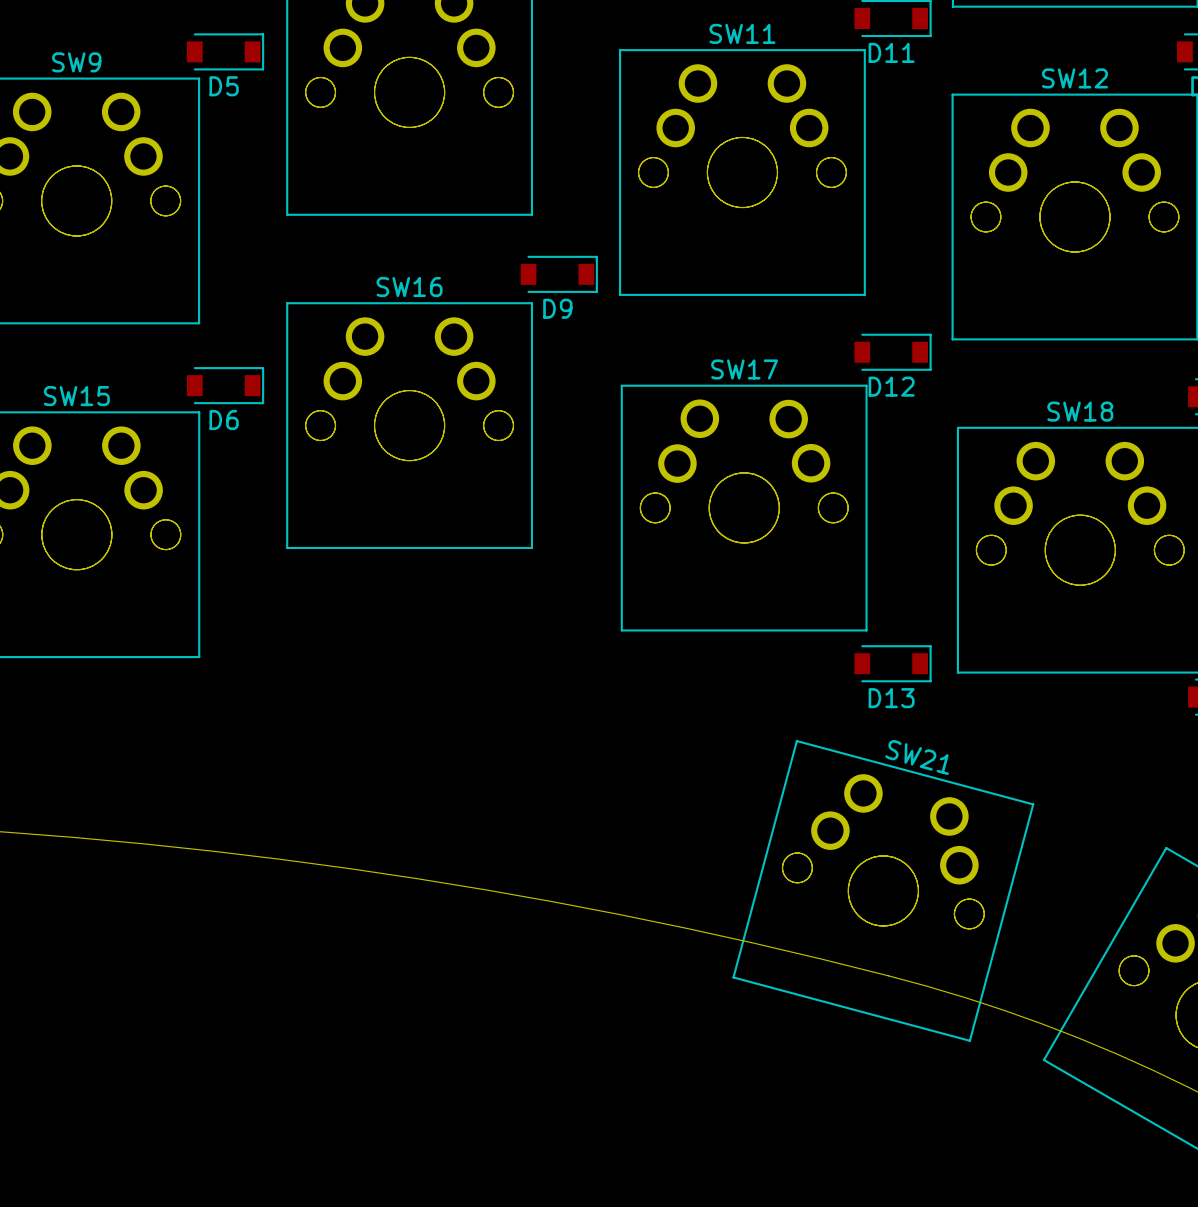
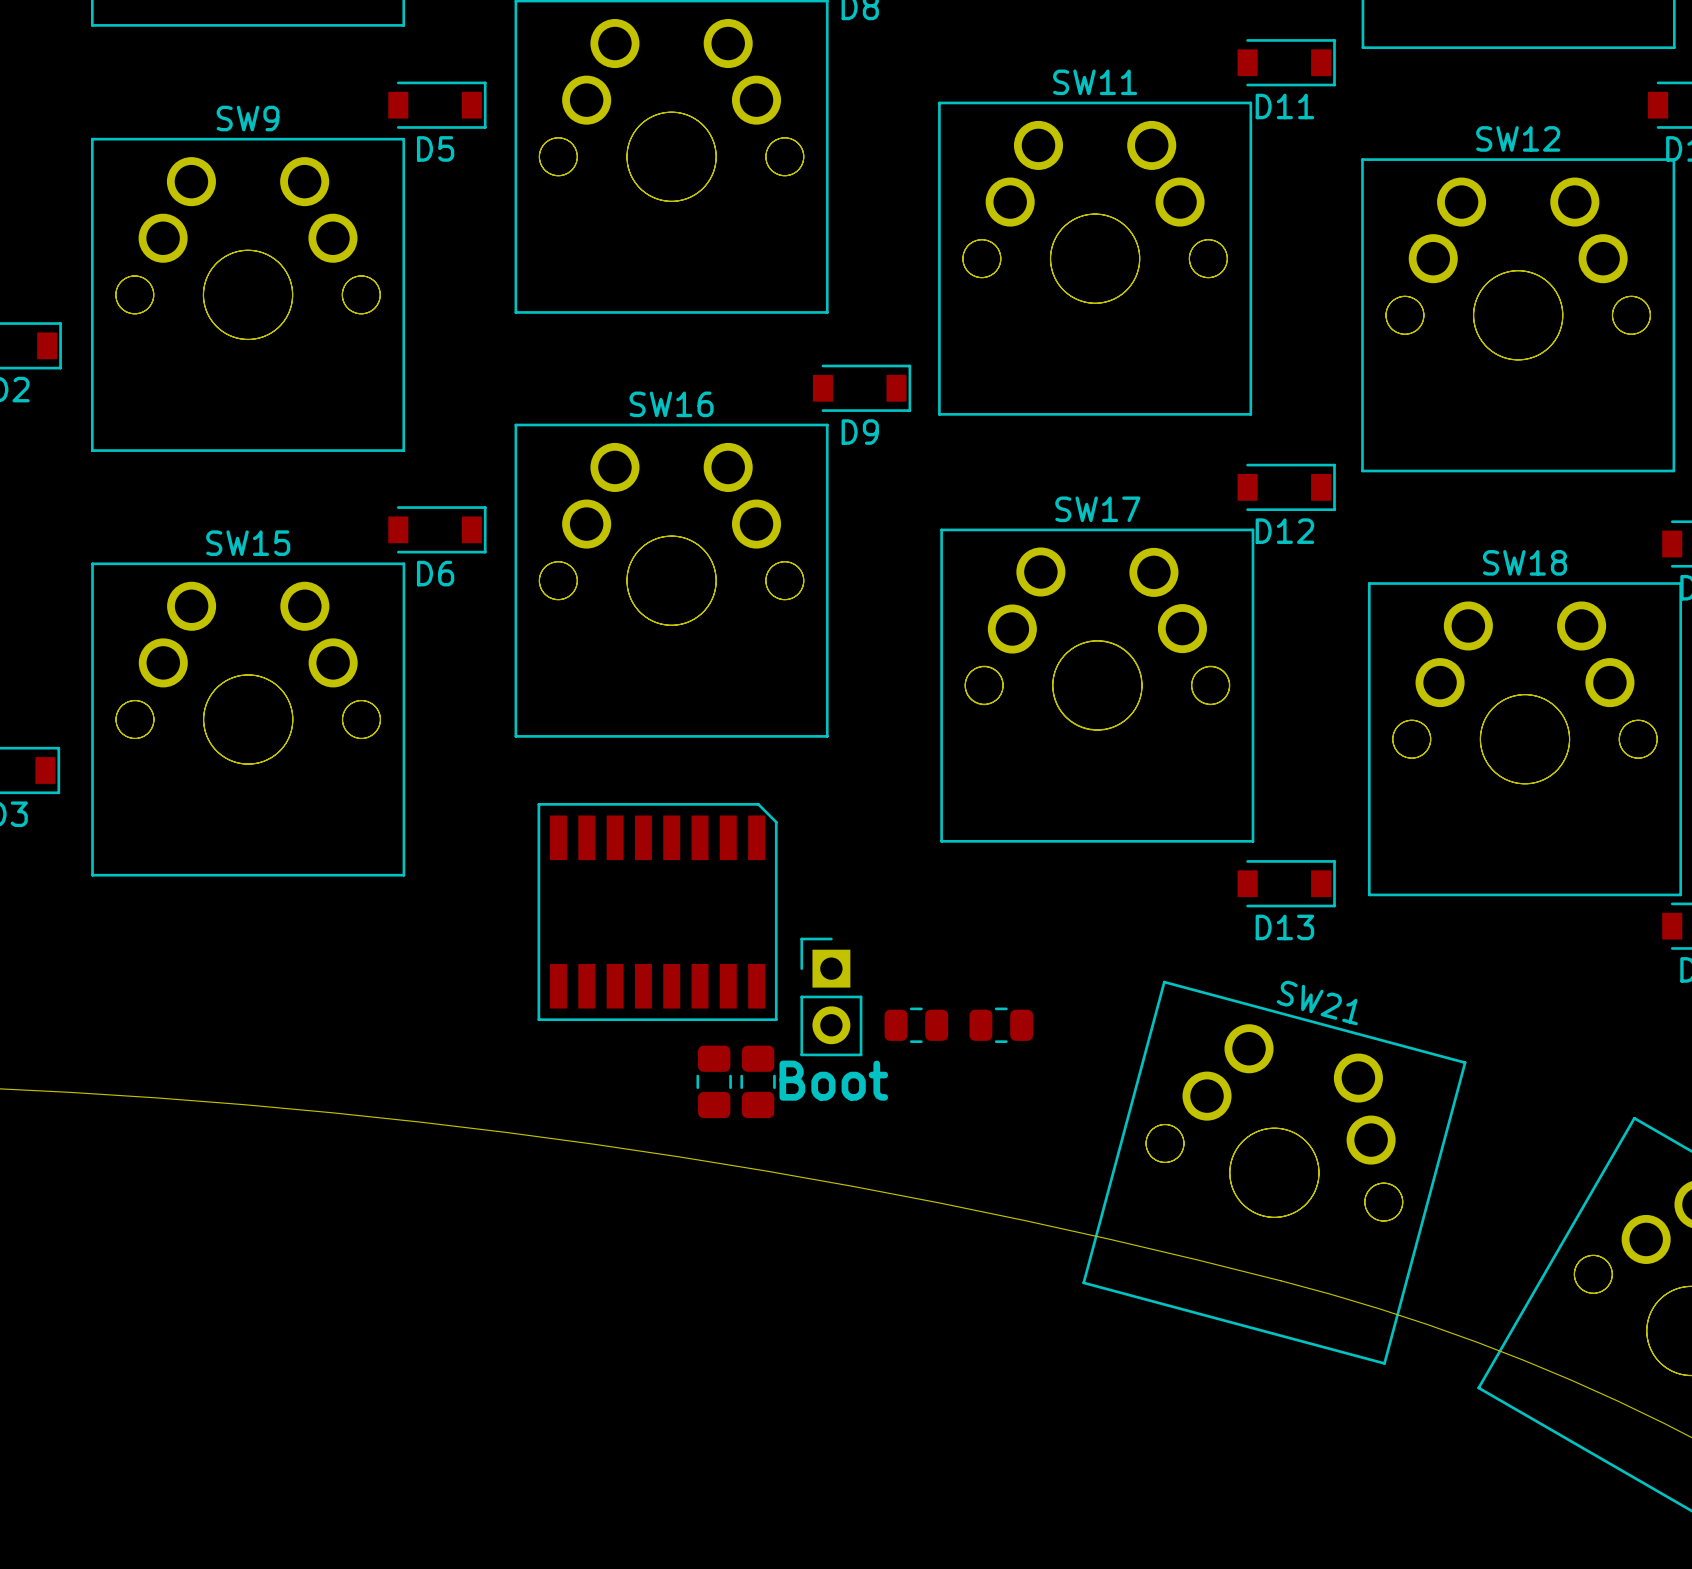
part: none -> (657, 912)
part: none -> (831, 996)
part: none -> (916, 1025)
part: none -> (1001, 1025)
text: none -> Boot (833, 1080)
part: none -> (714, 1081)
part: none -> (758, 1081)

